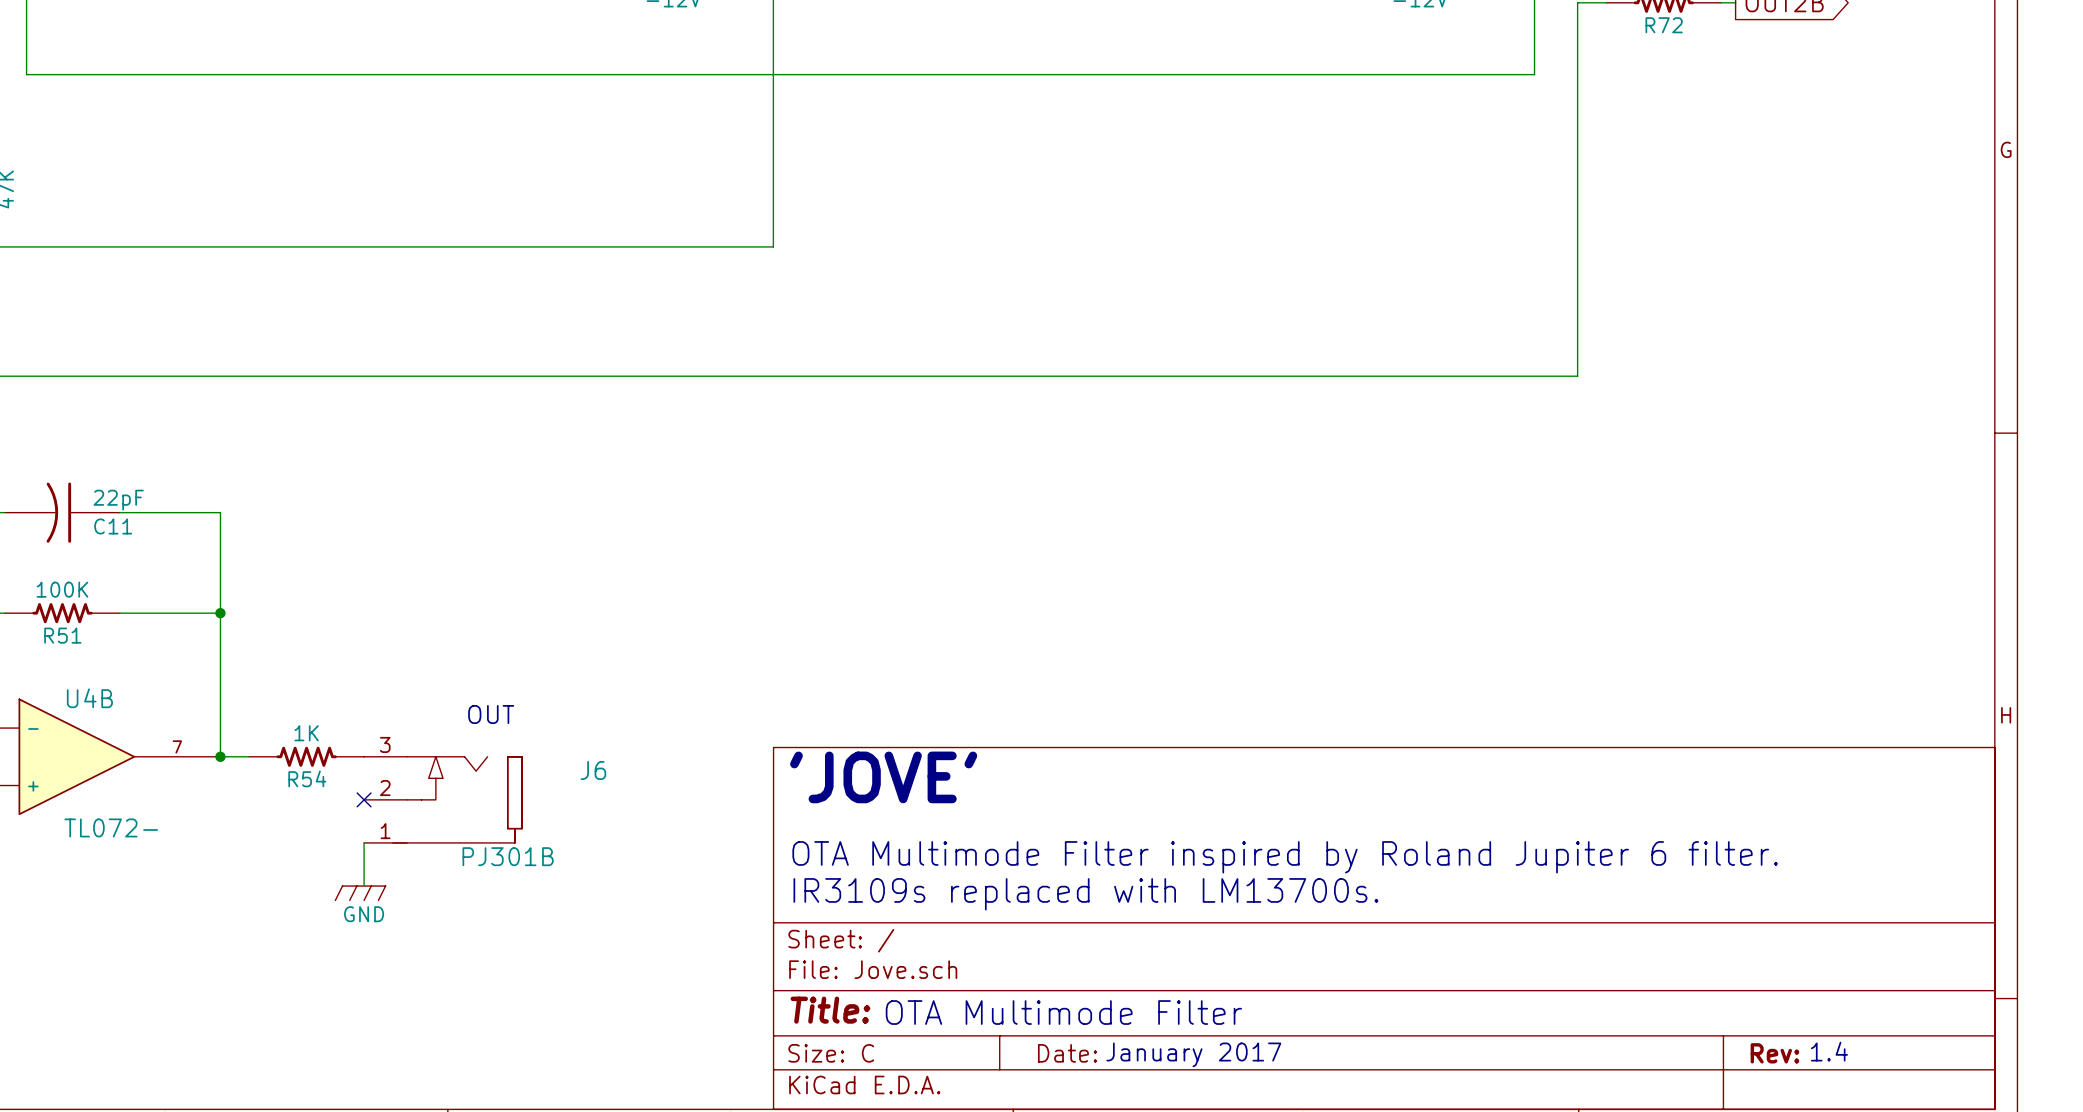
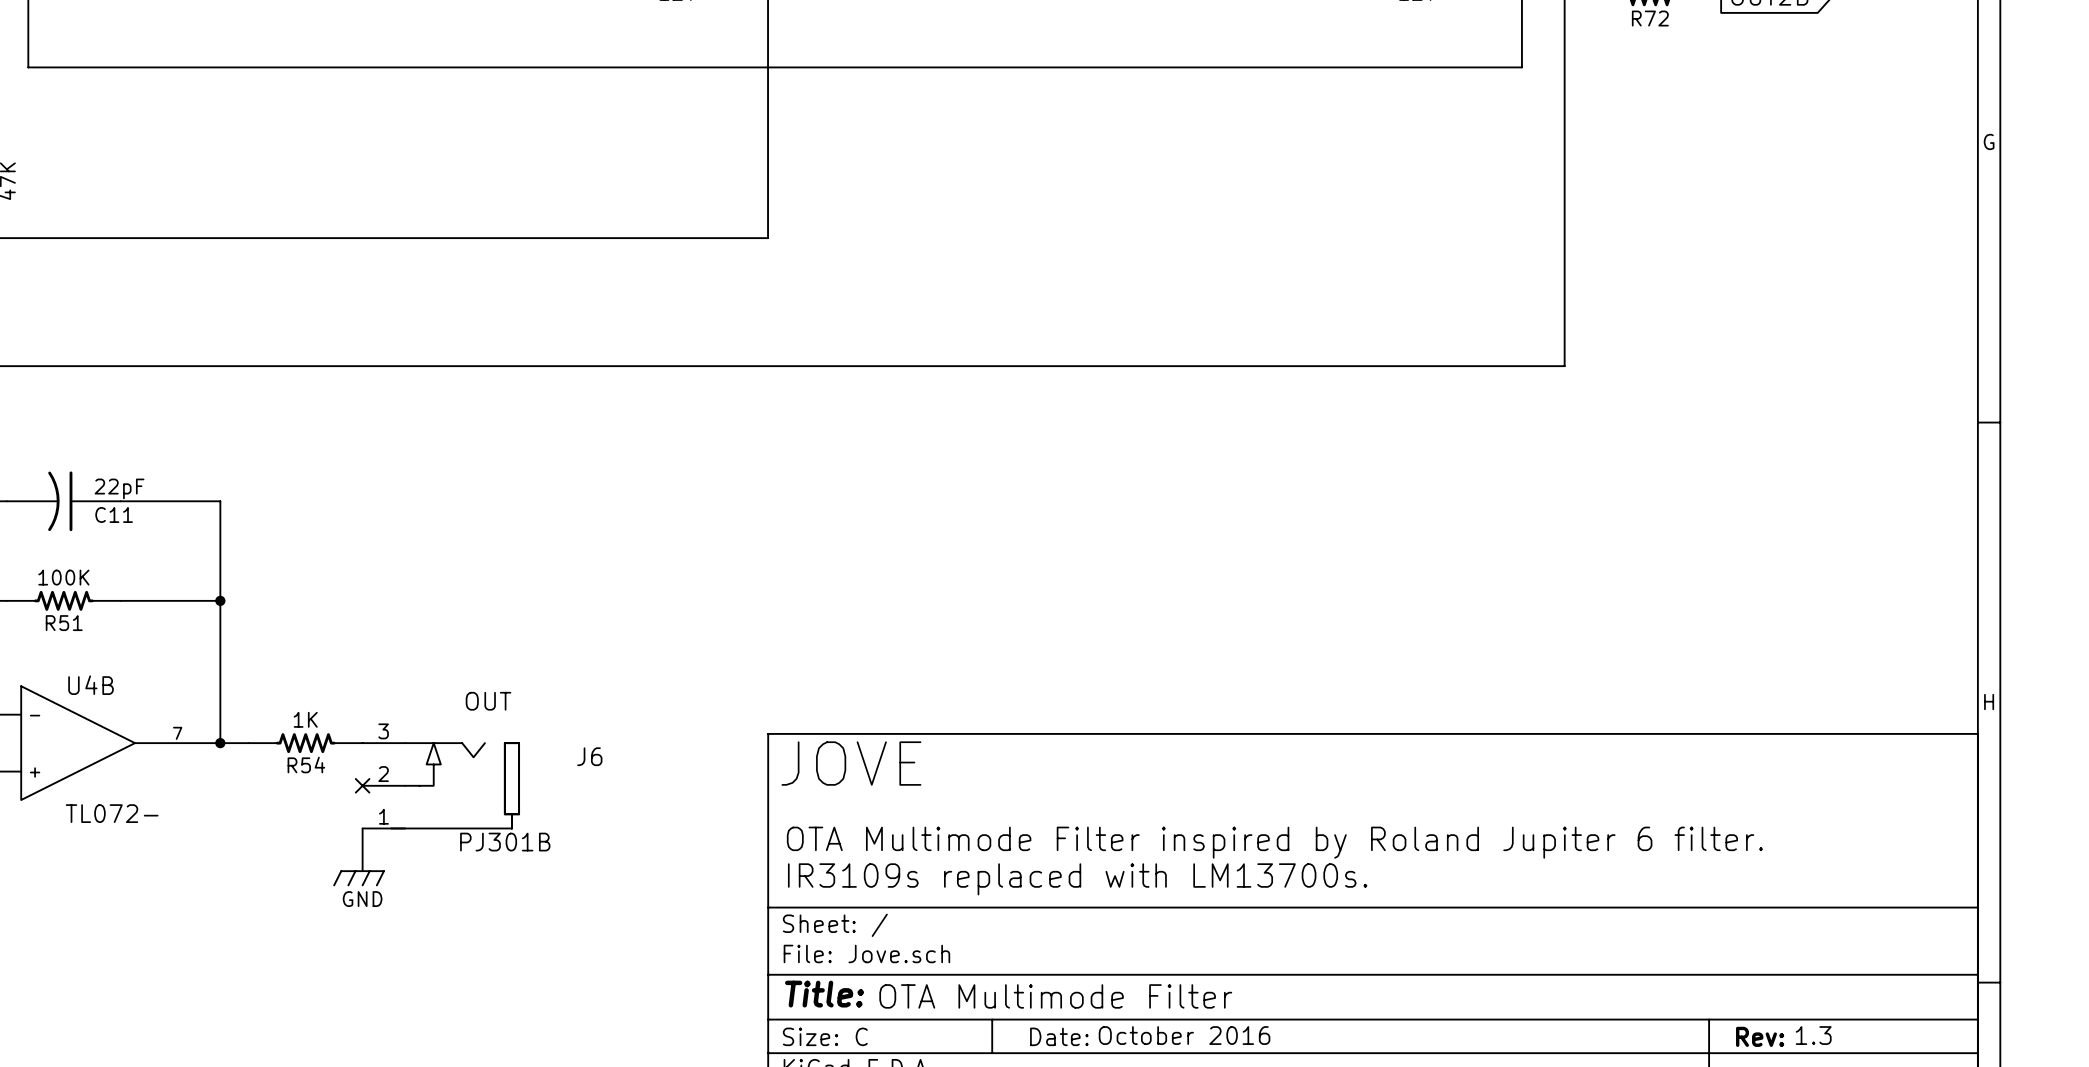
text: 'JOVE' (883, 777) -> JOVE (851, 763)
text: 1.4 (1829, 1051) -> 1.3 (1813, 1035)
text: January 2017 (1193, 1054) -> October 2016 (1184, 1035)

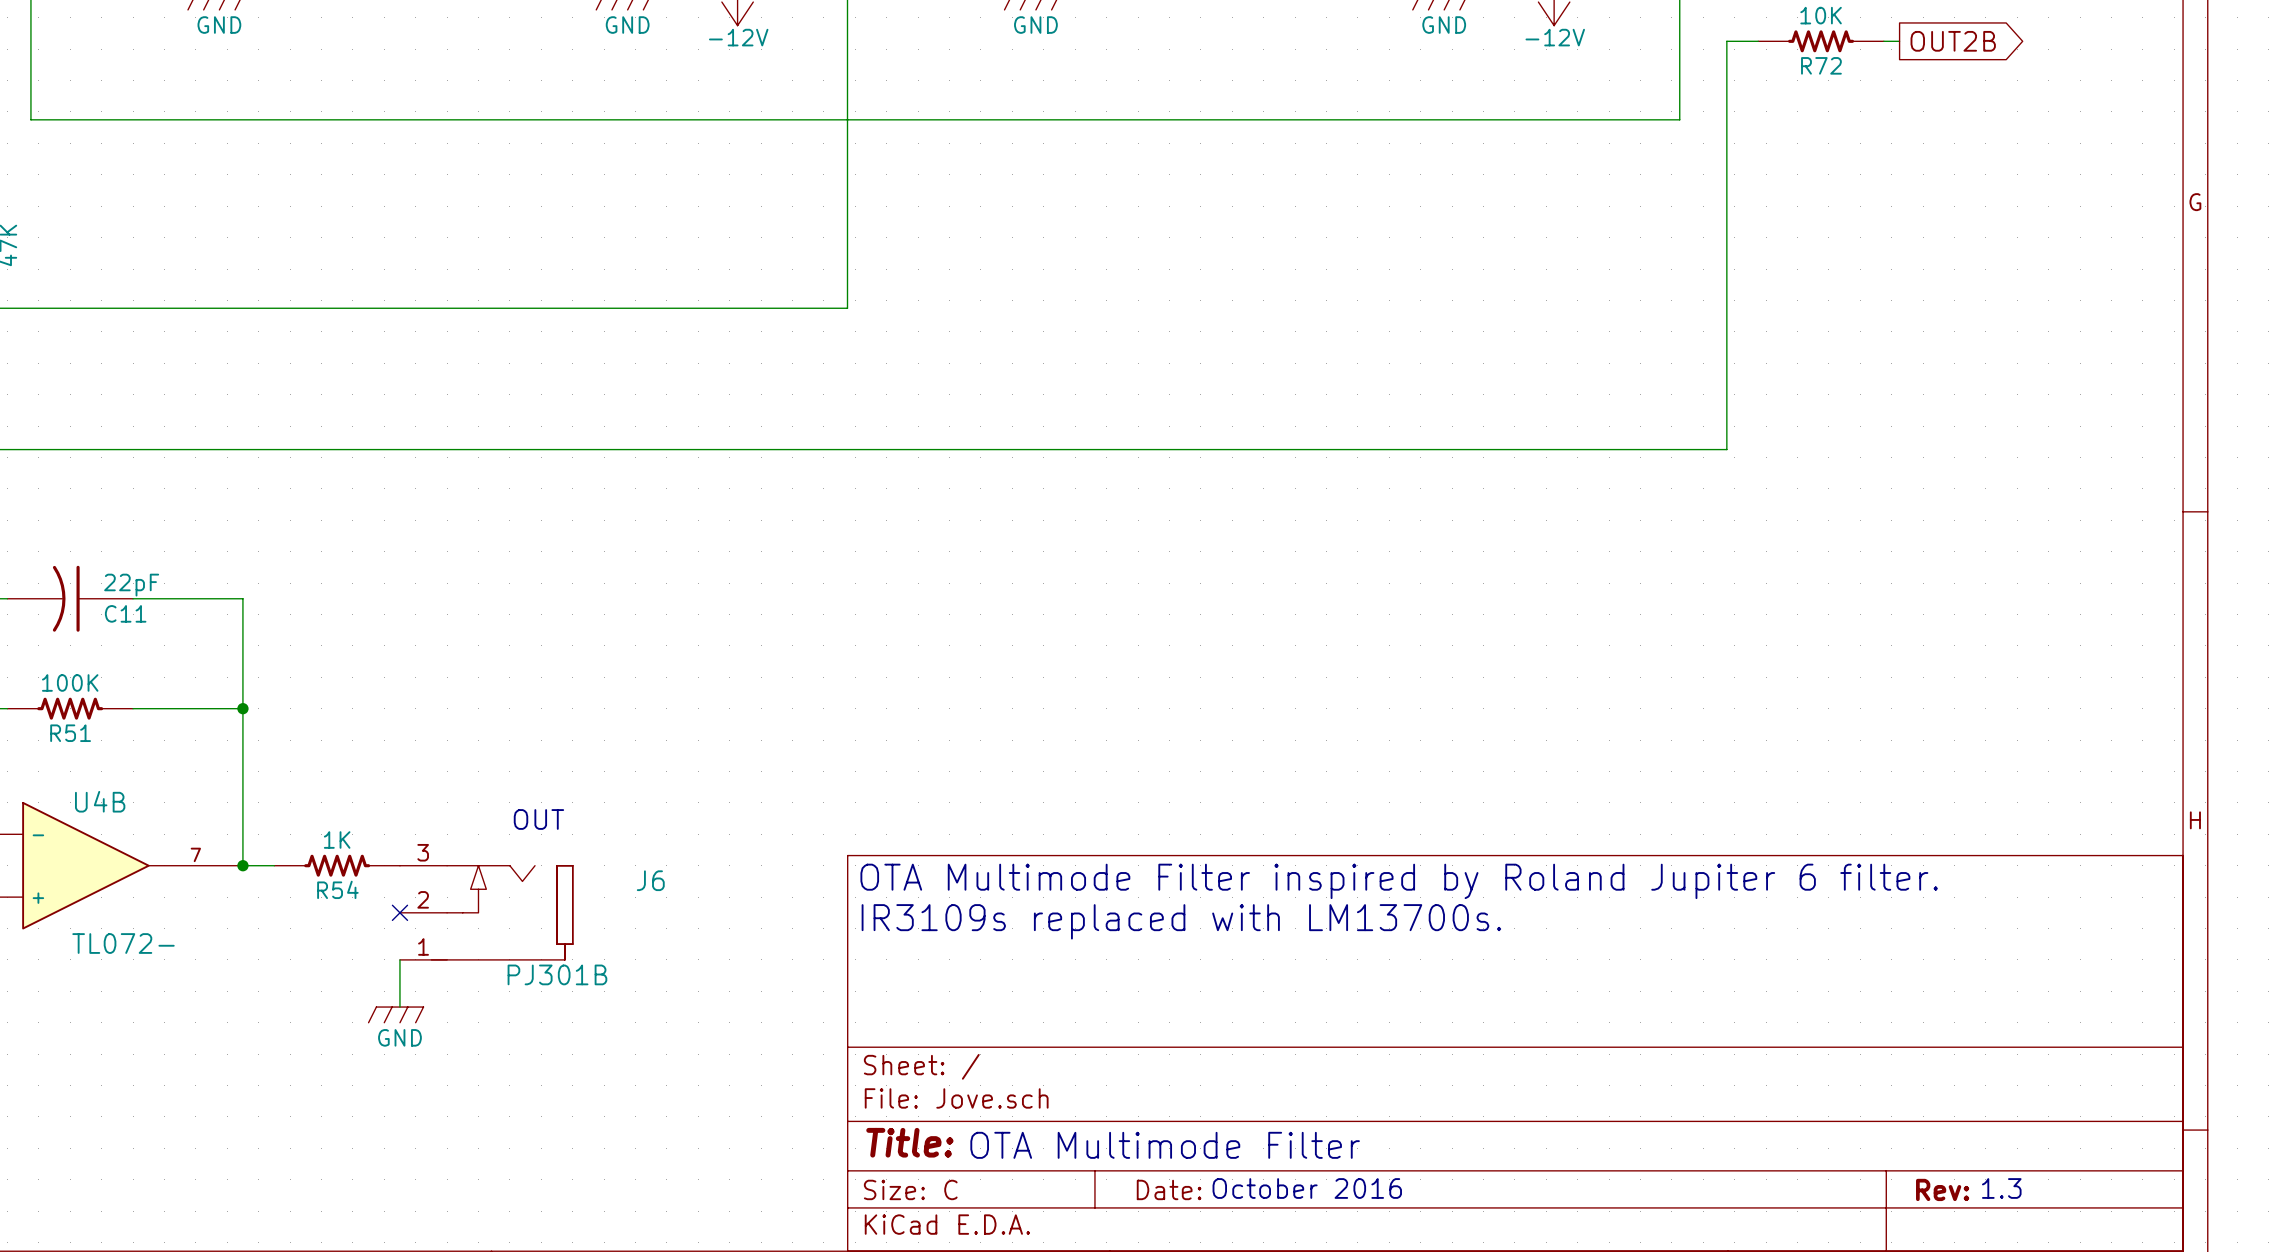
text: JOVE (851, 763) -> none
text position: OTA Multimode Filter inspired by Roland Jupiter 6 filter. (1274, 842) -> OTA Multimode Filter inspired by Roland Jupiter 6 filter. (1399, 881)
text position: IR3109s replaced with LM13700s. (1077, 879) -> IR3109s replaced with LM13700s. (1181, 921)

